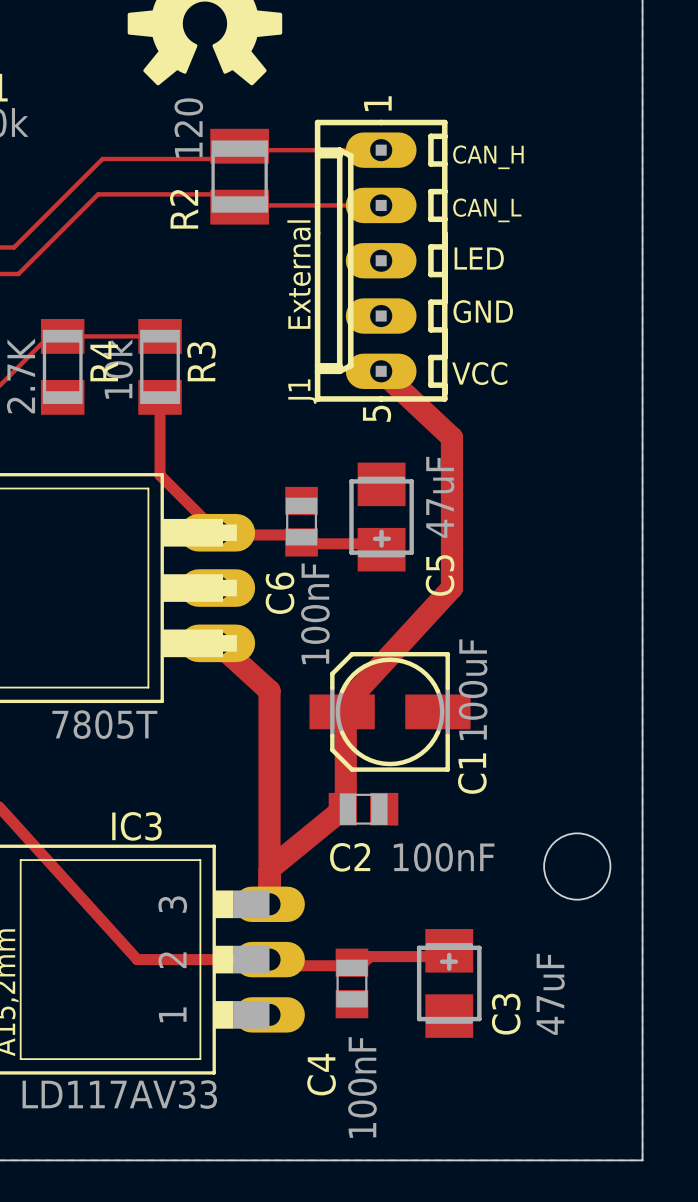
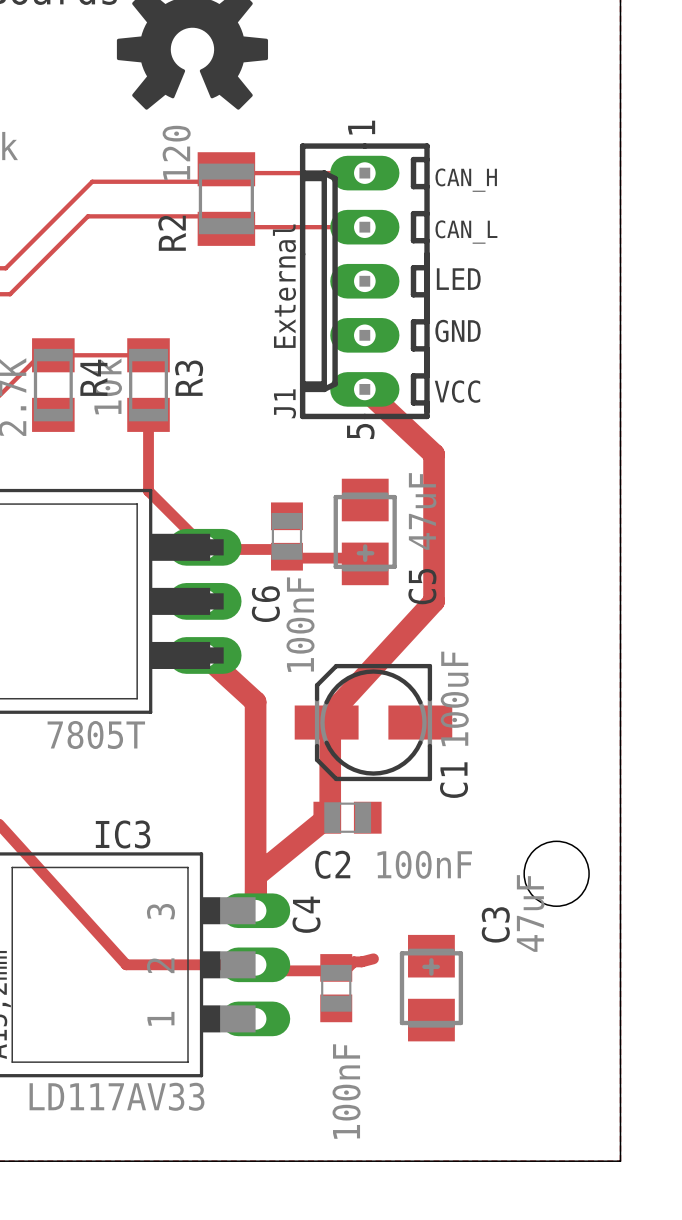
track: (449, 950) (431, 956) (378, 956) -> (373, 958) (361, 961)
C3 value position: 47uF (550, 994) -> 47uF (530, 913)
C3 name position: C3 (506, 1014) -> C3 (495, 924)
C4 name position: C4 (321, 1074) -> C4 (306, 914)

